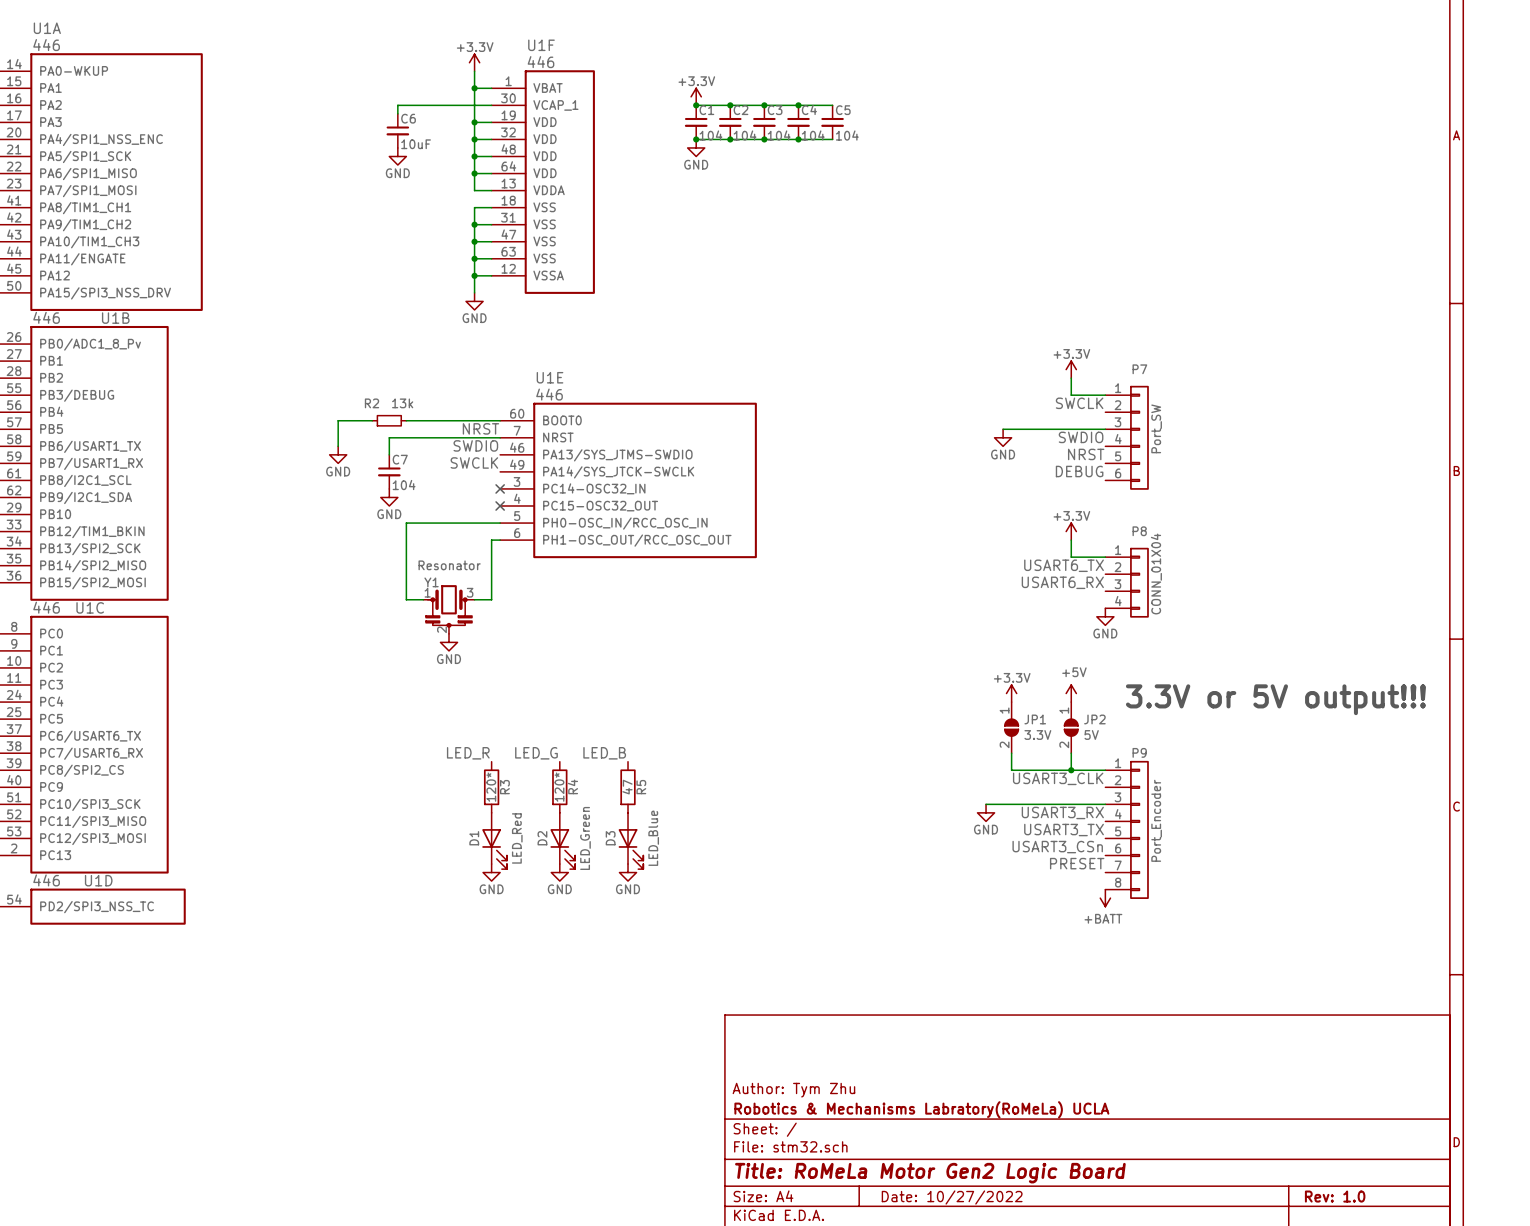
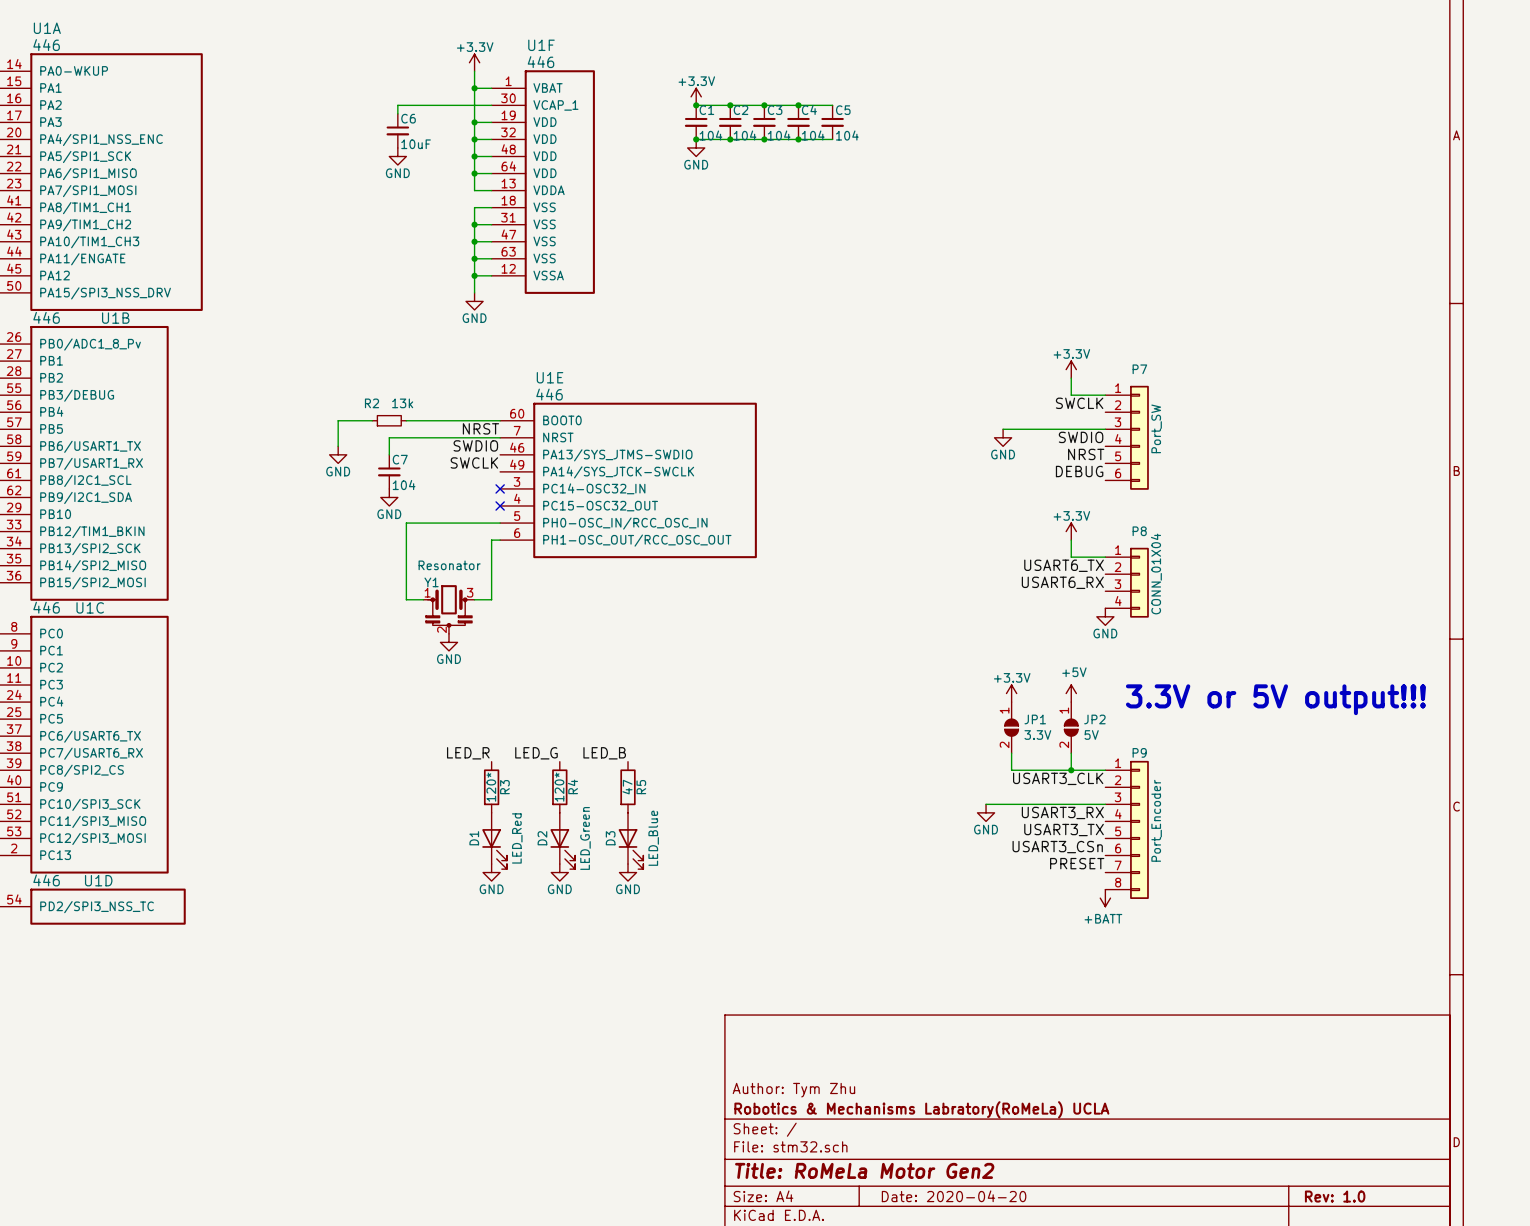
title block: Title: RoMeLa Motor Gen2 Logic Board (930, 1173) -> Title: RoMeLa Motor Gen2 (864, 1170)
title block: Date: 10/27/2022 (952, 1197) -> Date: 2020-04-20 (954, 1196)

